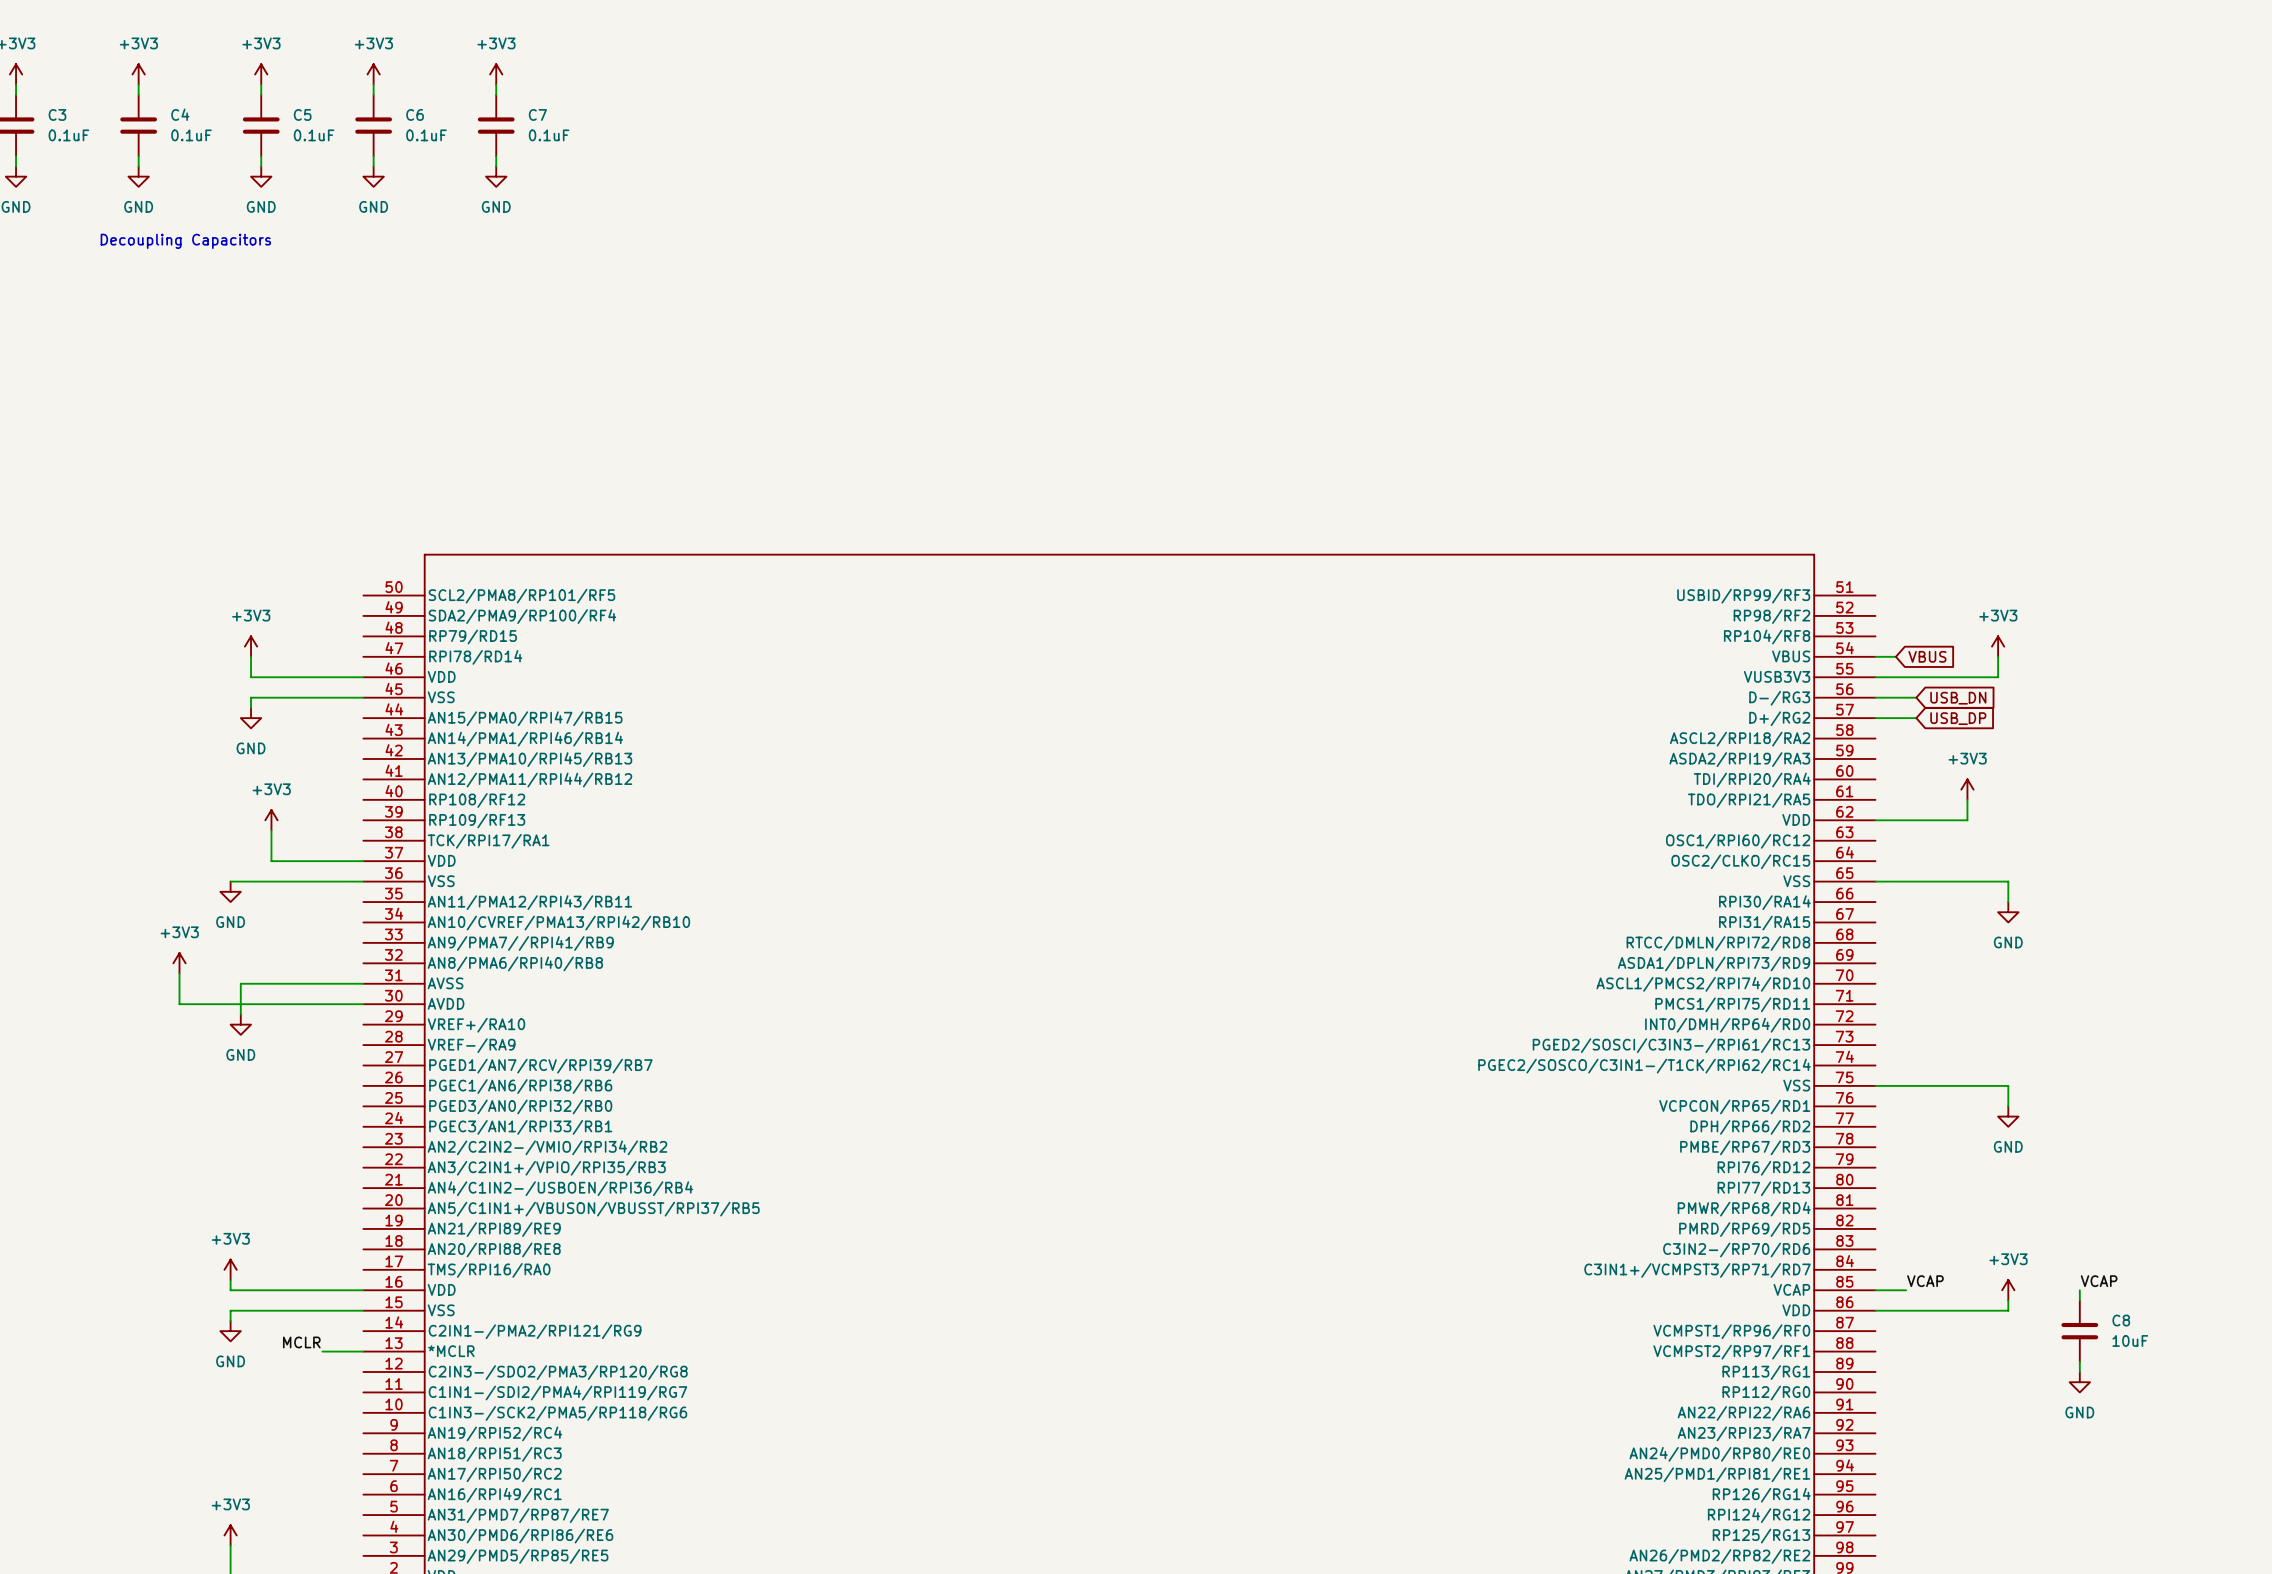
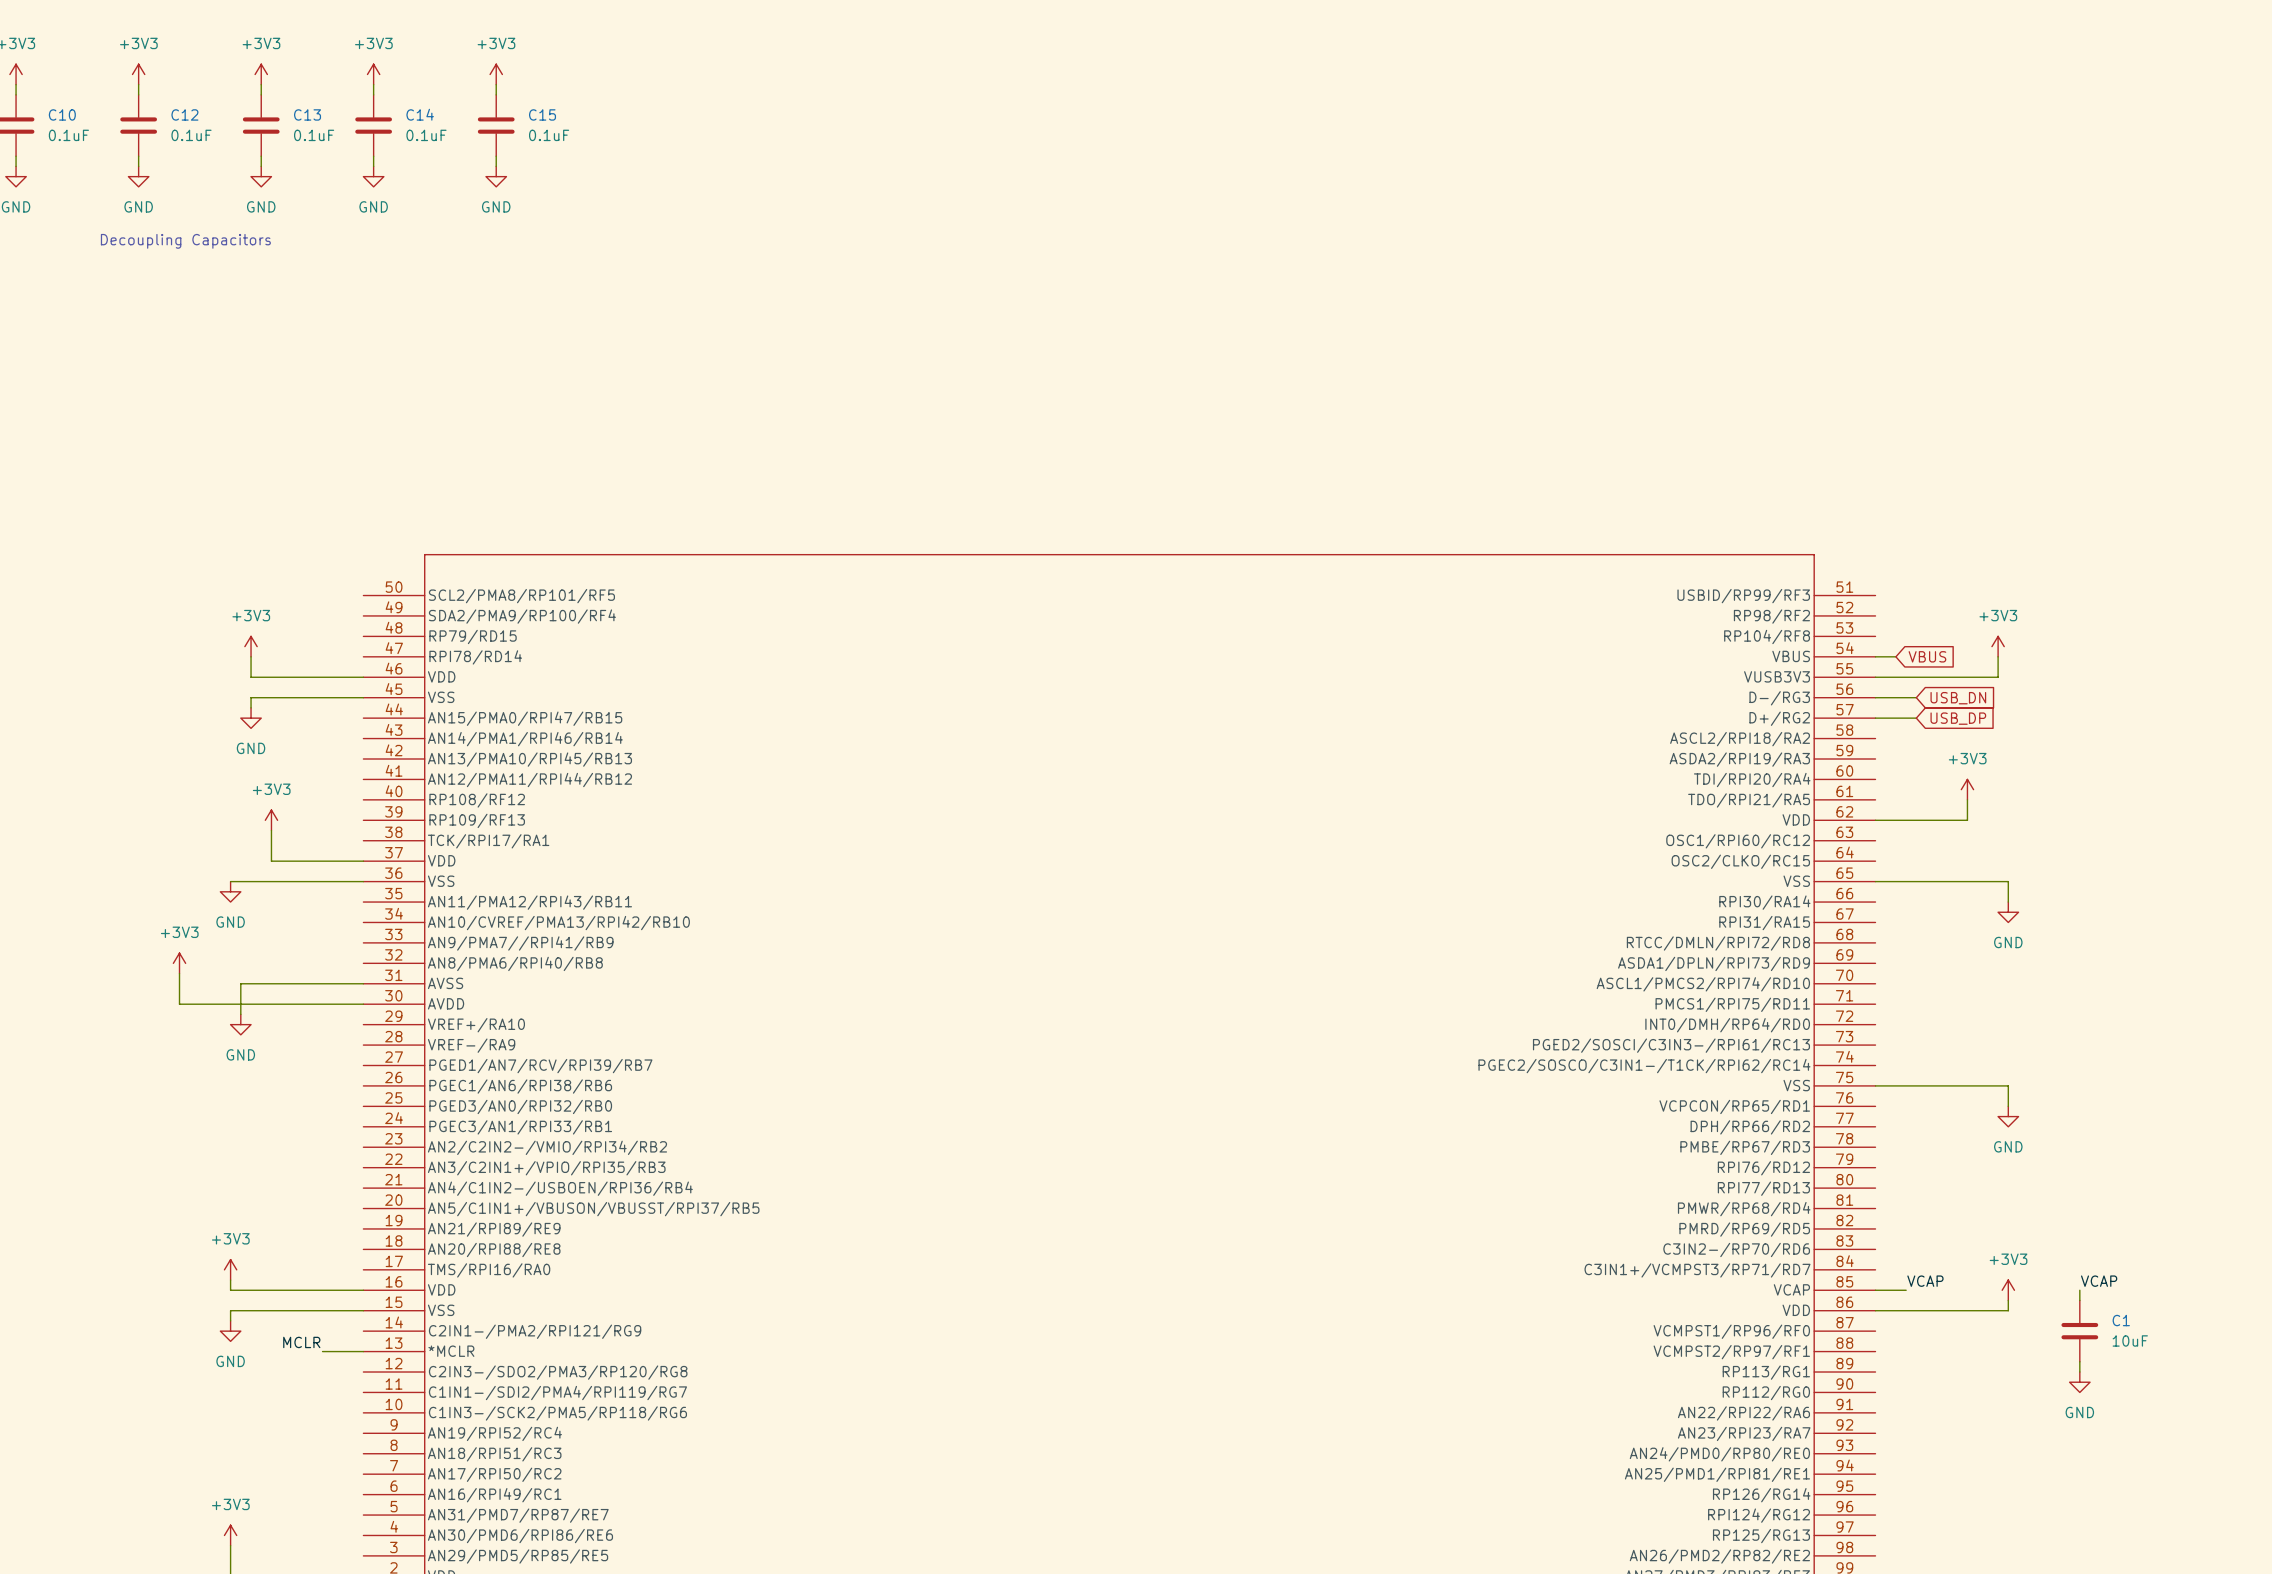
C3 name: C3 (57, 114) -> C10 (62, 114)
C4 name: C4 (180, 114) -> C12 (184, 114)
C5 name: C5 (302, 114) -> C13 (307, 114)
C6 name: C6 (415, 114) -> C14 (420, 114)
C7 name: C7 (537, 114) -> C15 (542, 114)
C8 name: C8 (2121, 1320) -> C1 (2121, 1320)

